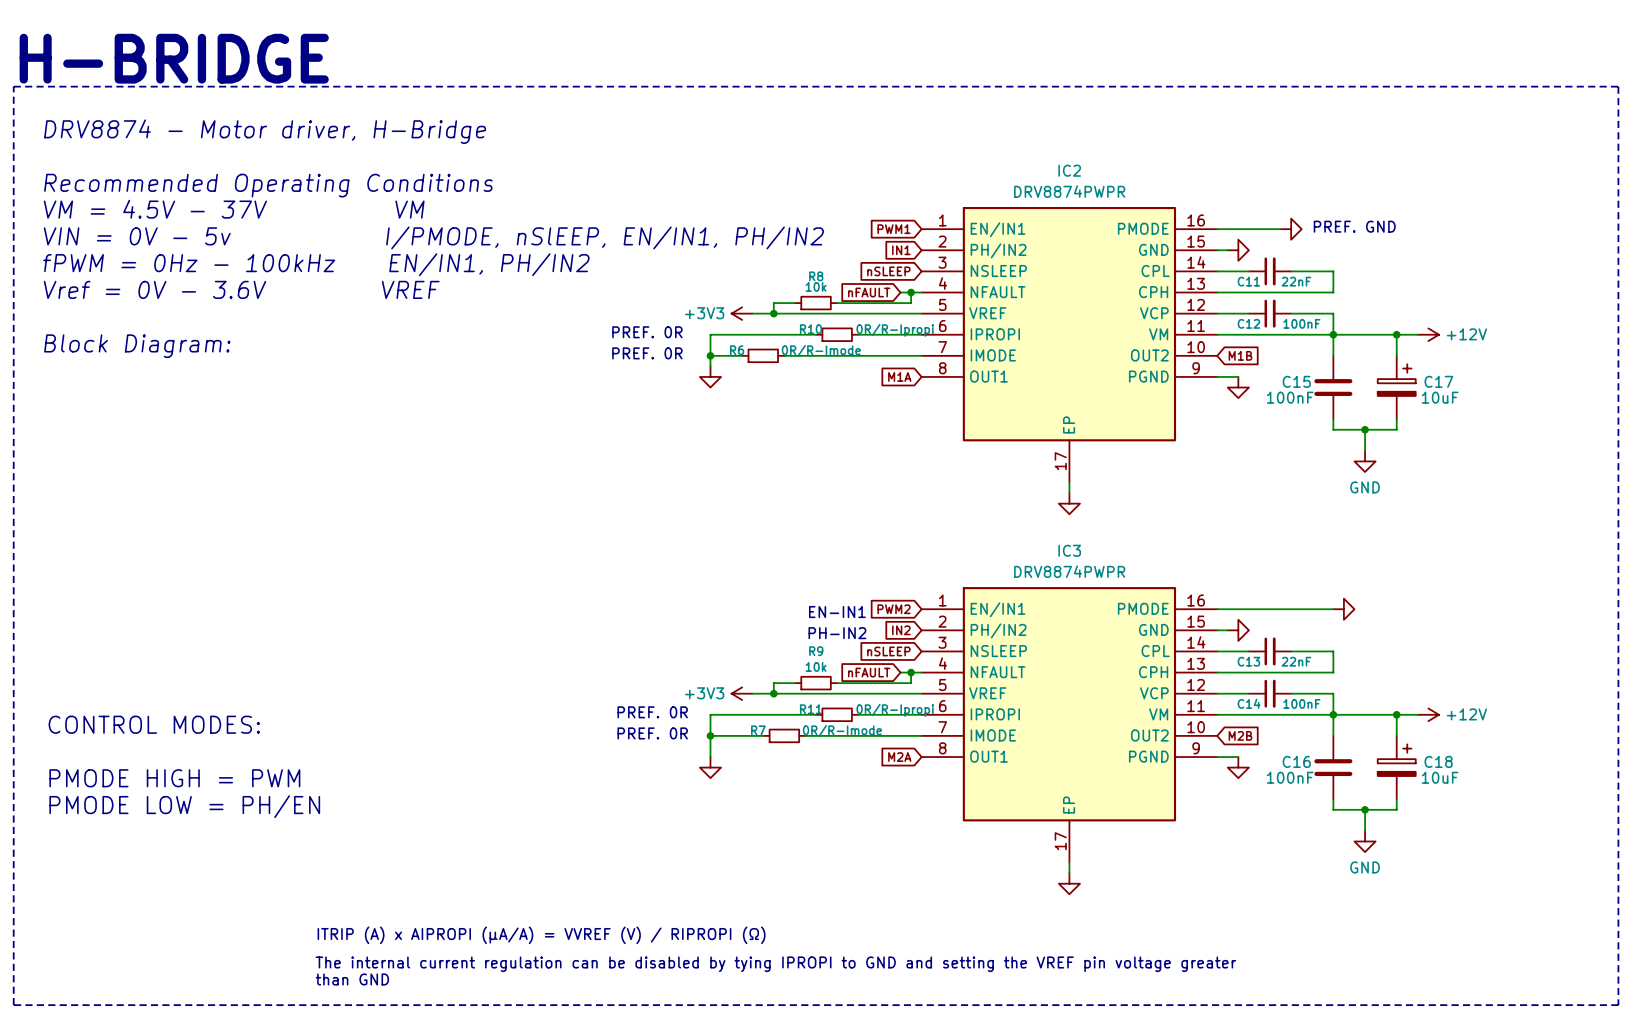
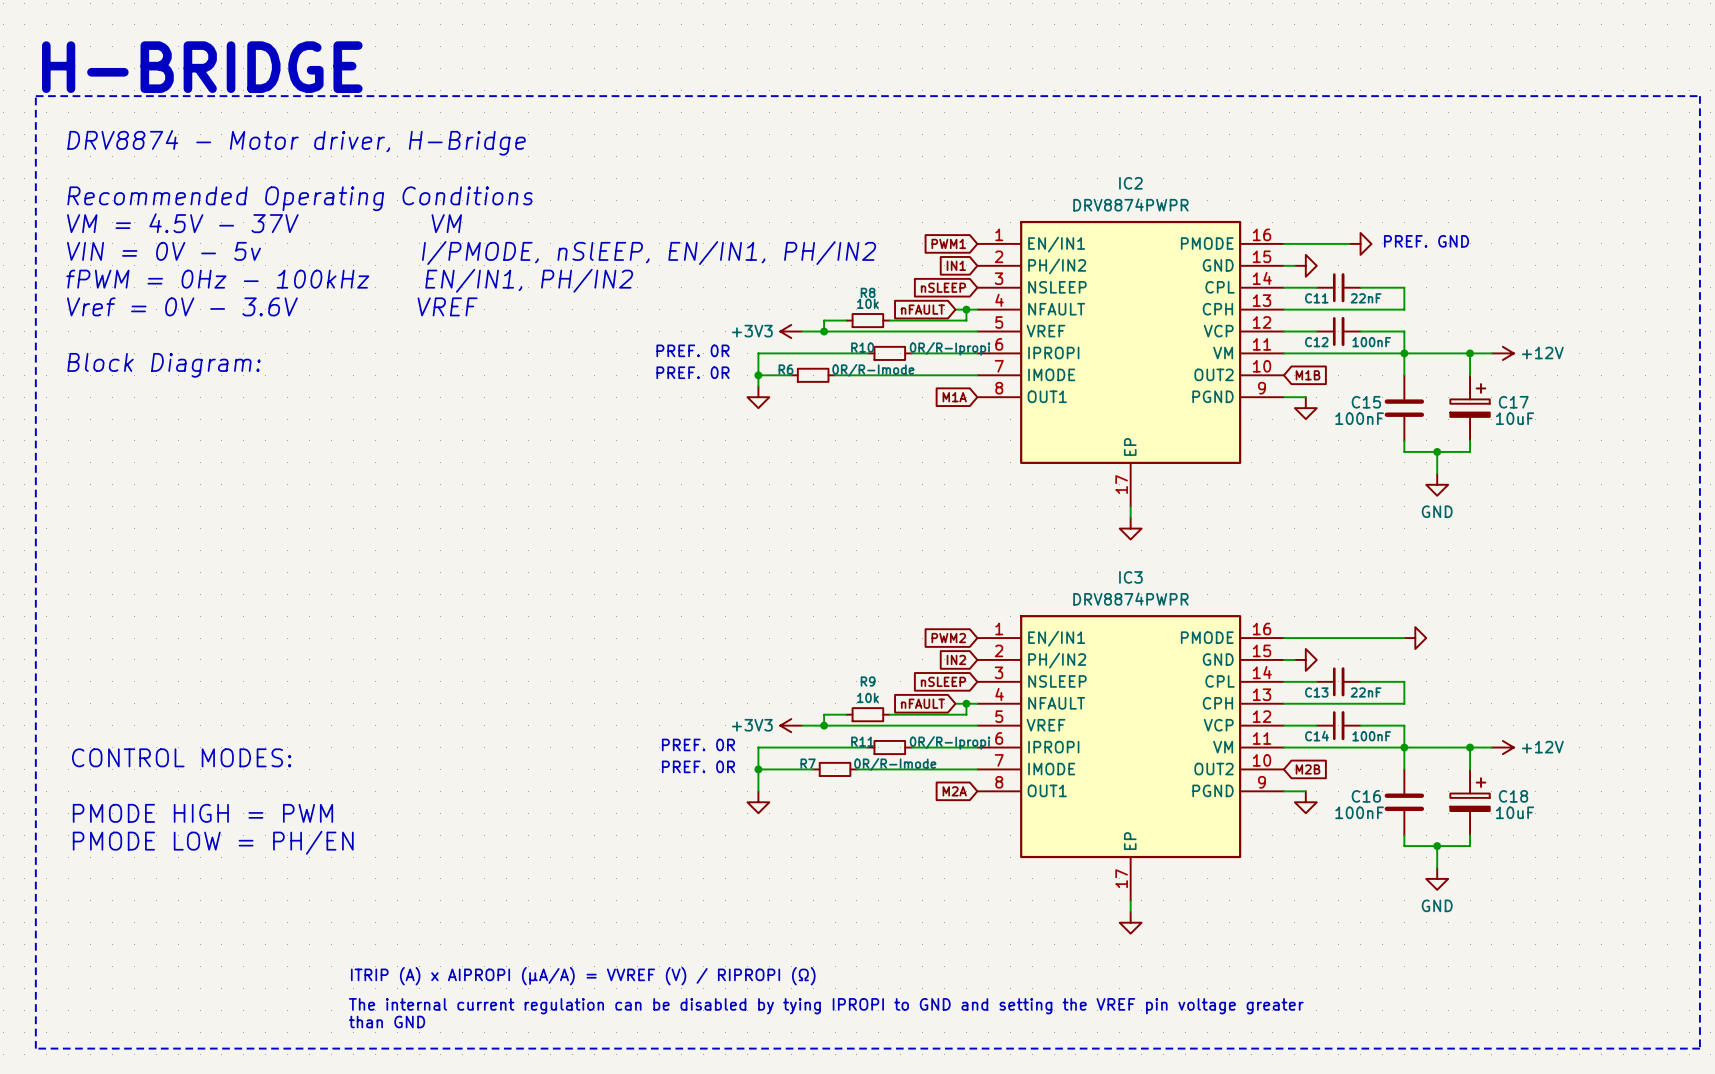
text: EN-IN1 (837, 612) -> none
text: PH-IN2 (837, 633) -> none

